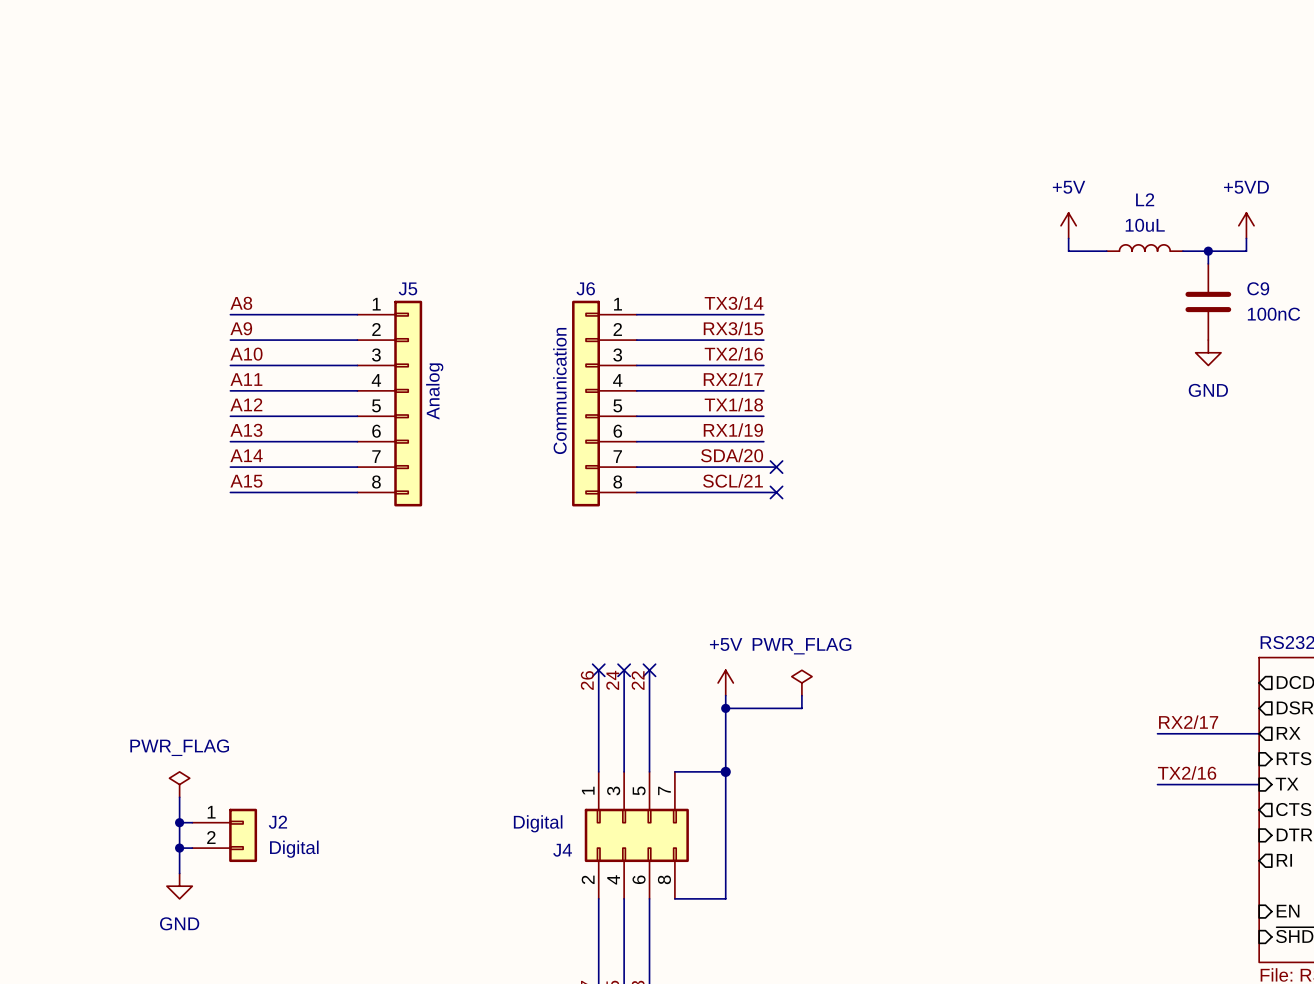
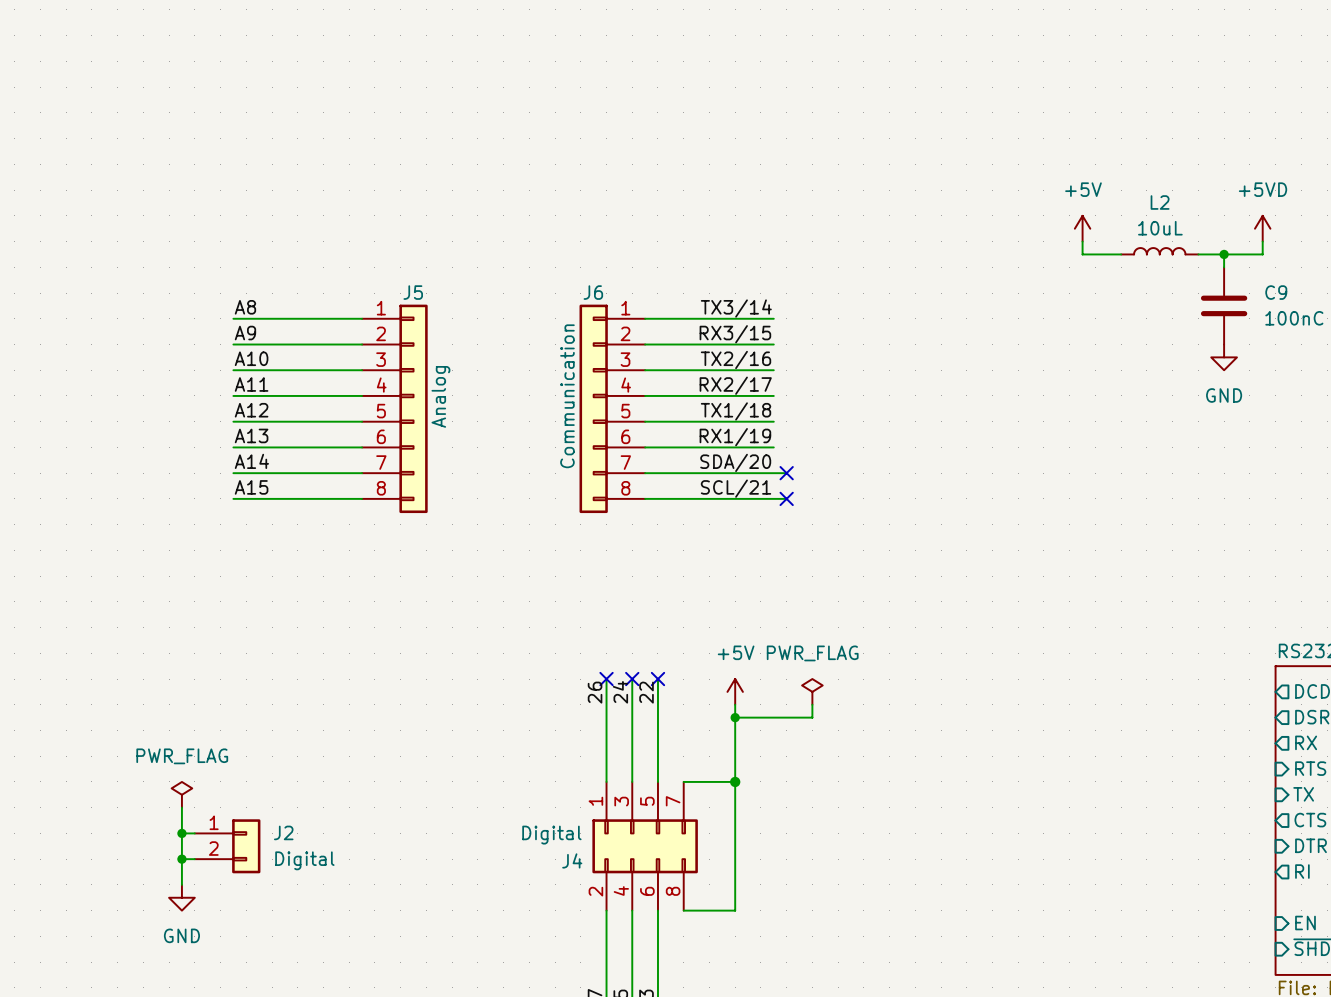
label: RX2/17 (1188, 722) -> none
wire: (1157, 733) (1259, 733) -> none
label: TX2/16 (1187, 773) -> none
wire: (1157, 784) (1259, 784) -> none

